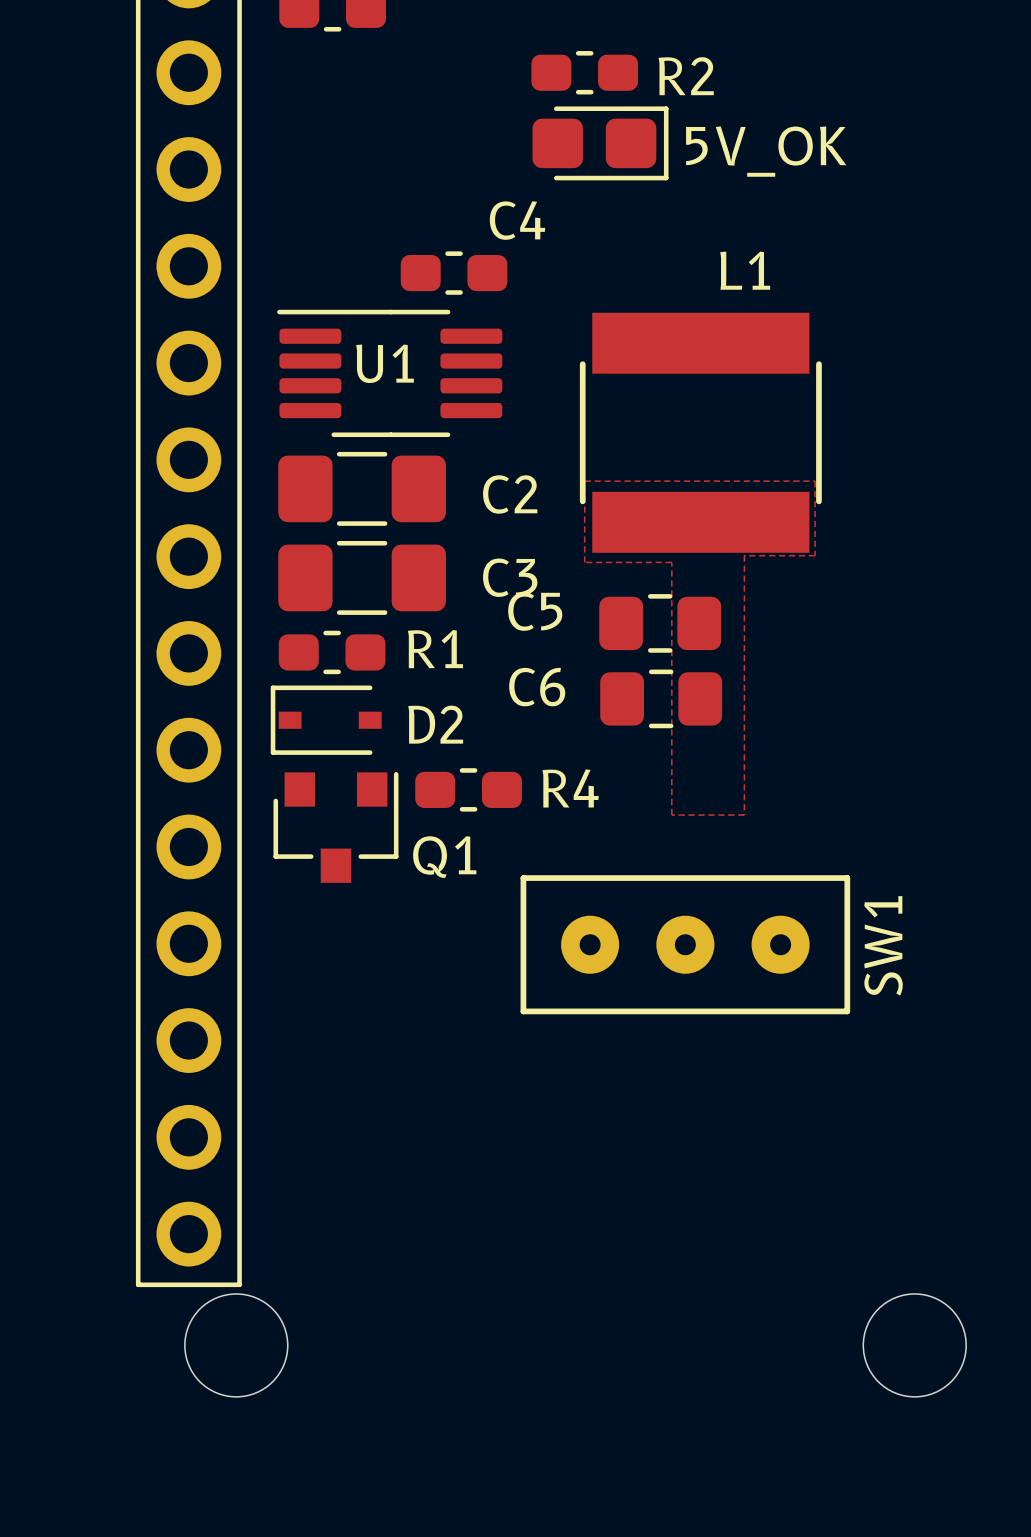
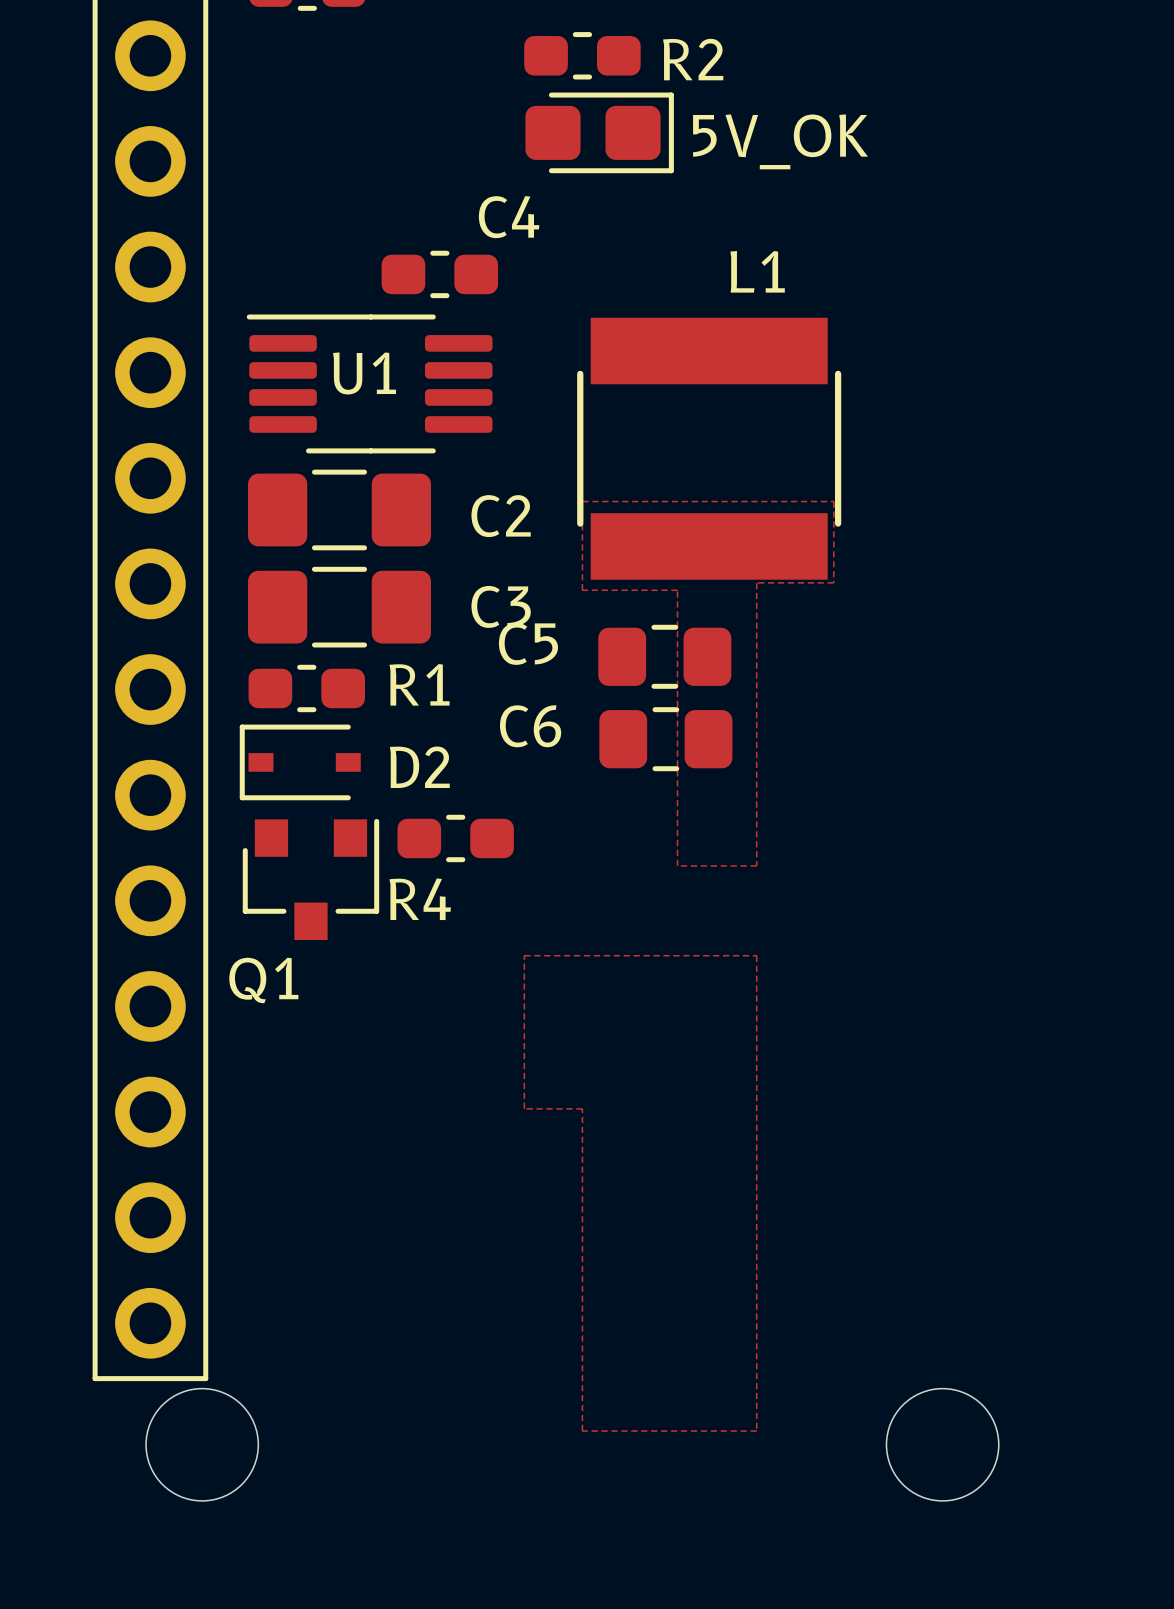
R4 name position: R4 (570, 788) -> R4 (420, 899)
Q1 name position: Q1 (444, 857) -> Q1 (263, 980)
zone outline: none -> (524, 955) (524, 1108) (582, 1108) (582, 1431) (756, 1431) (756, 955) (524, 955)
SW1: (685, 944) -> none

